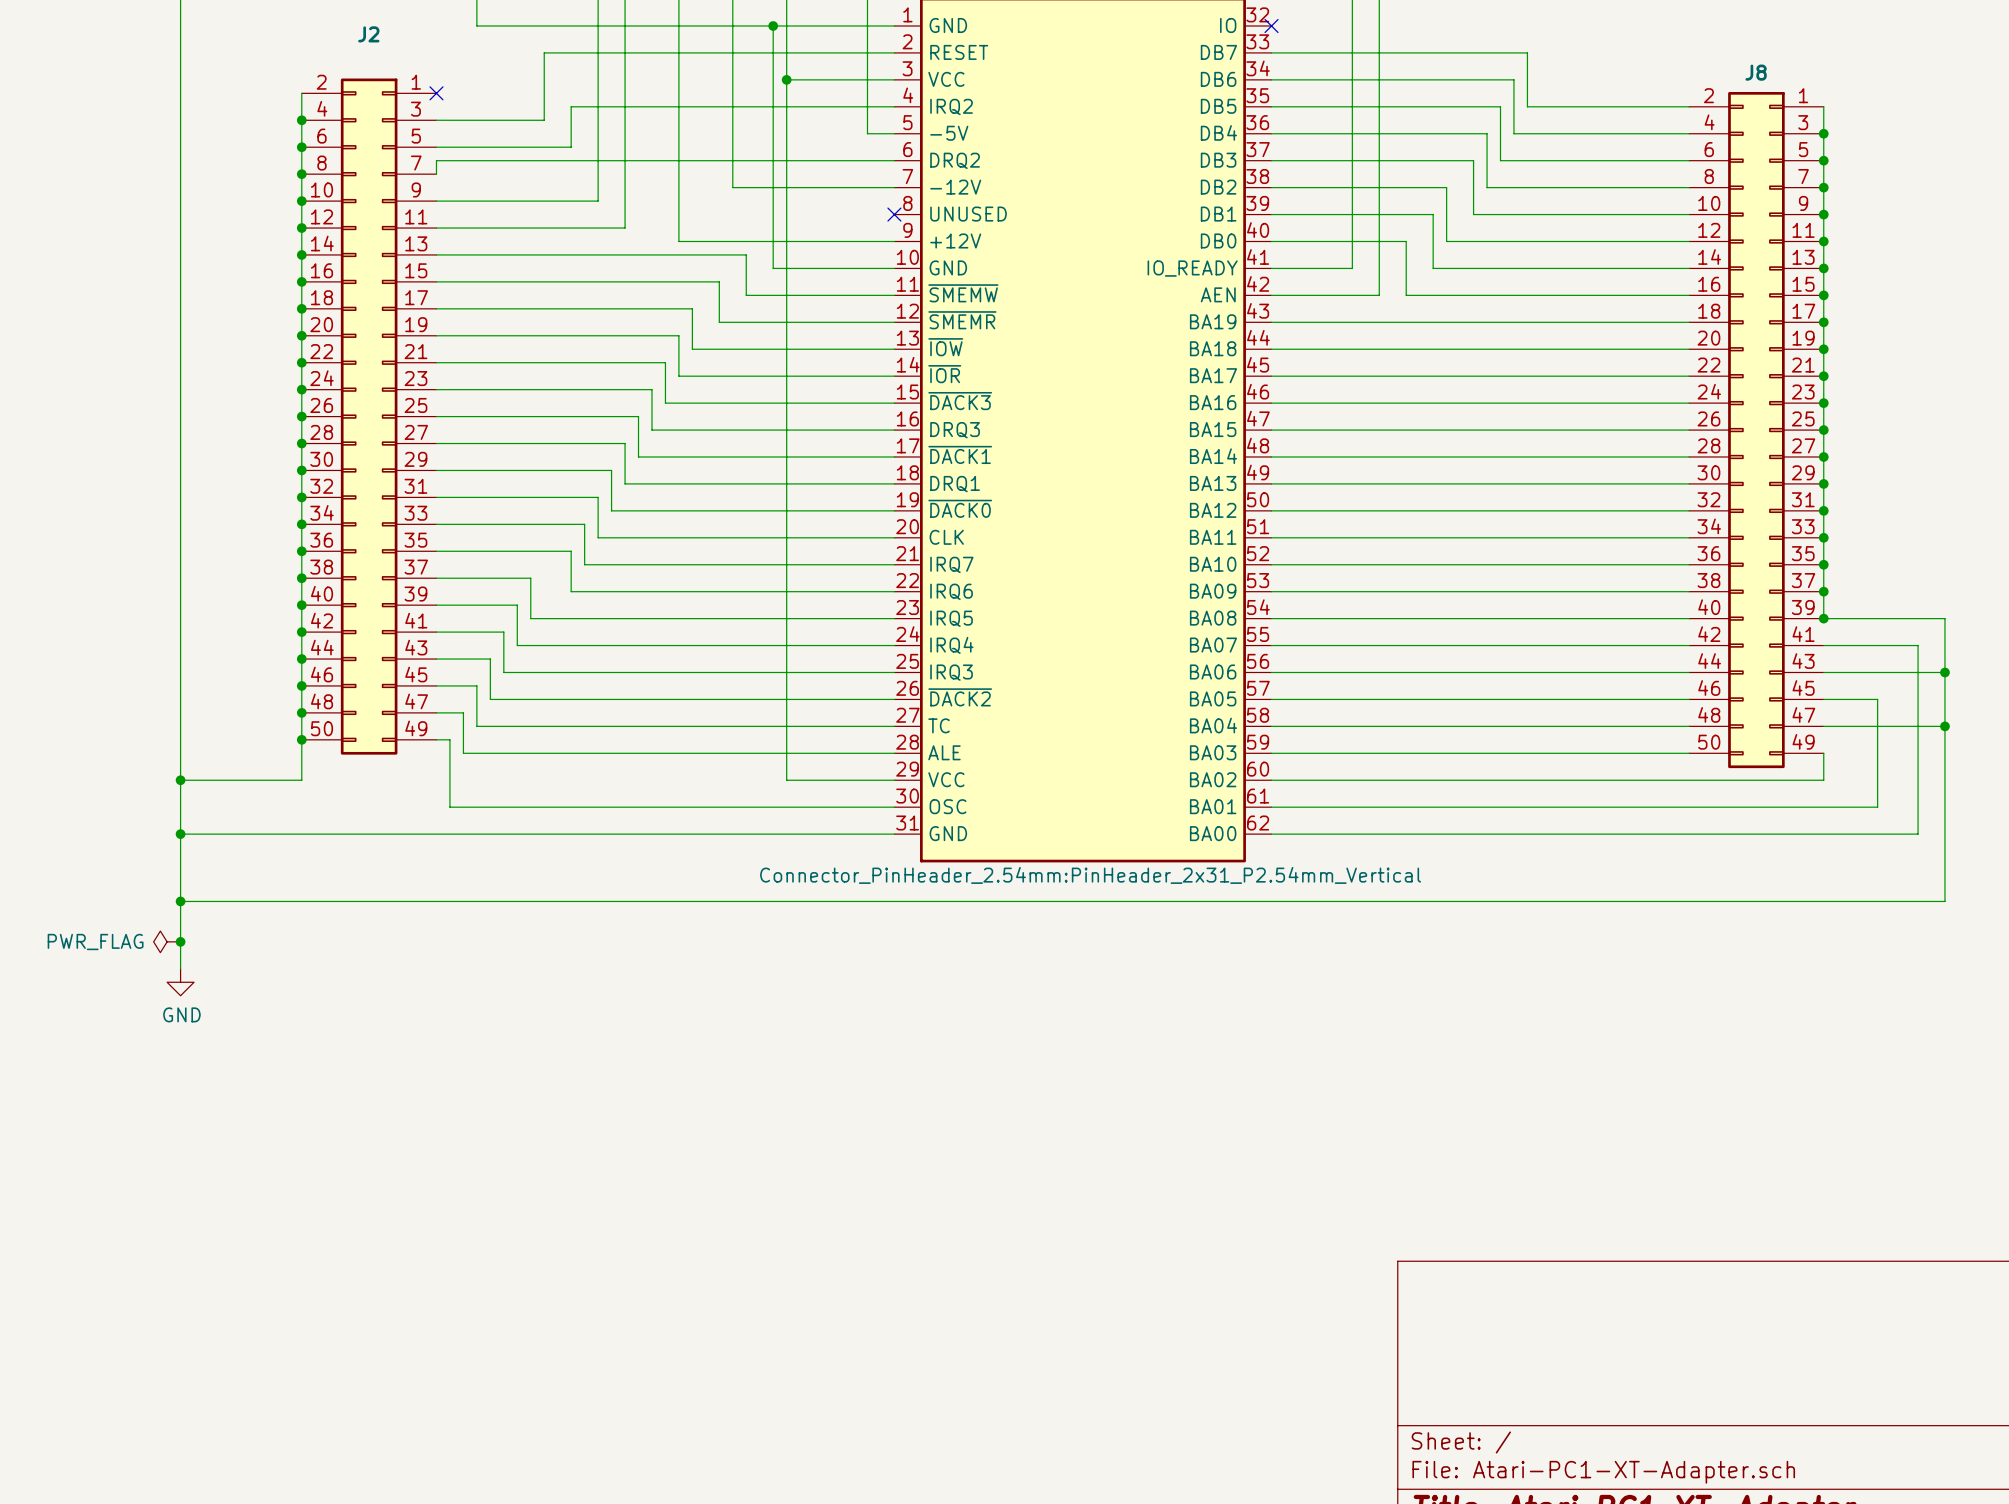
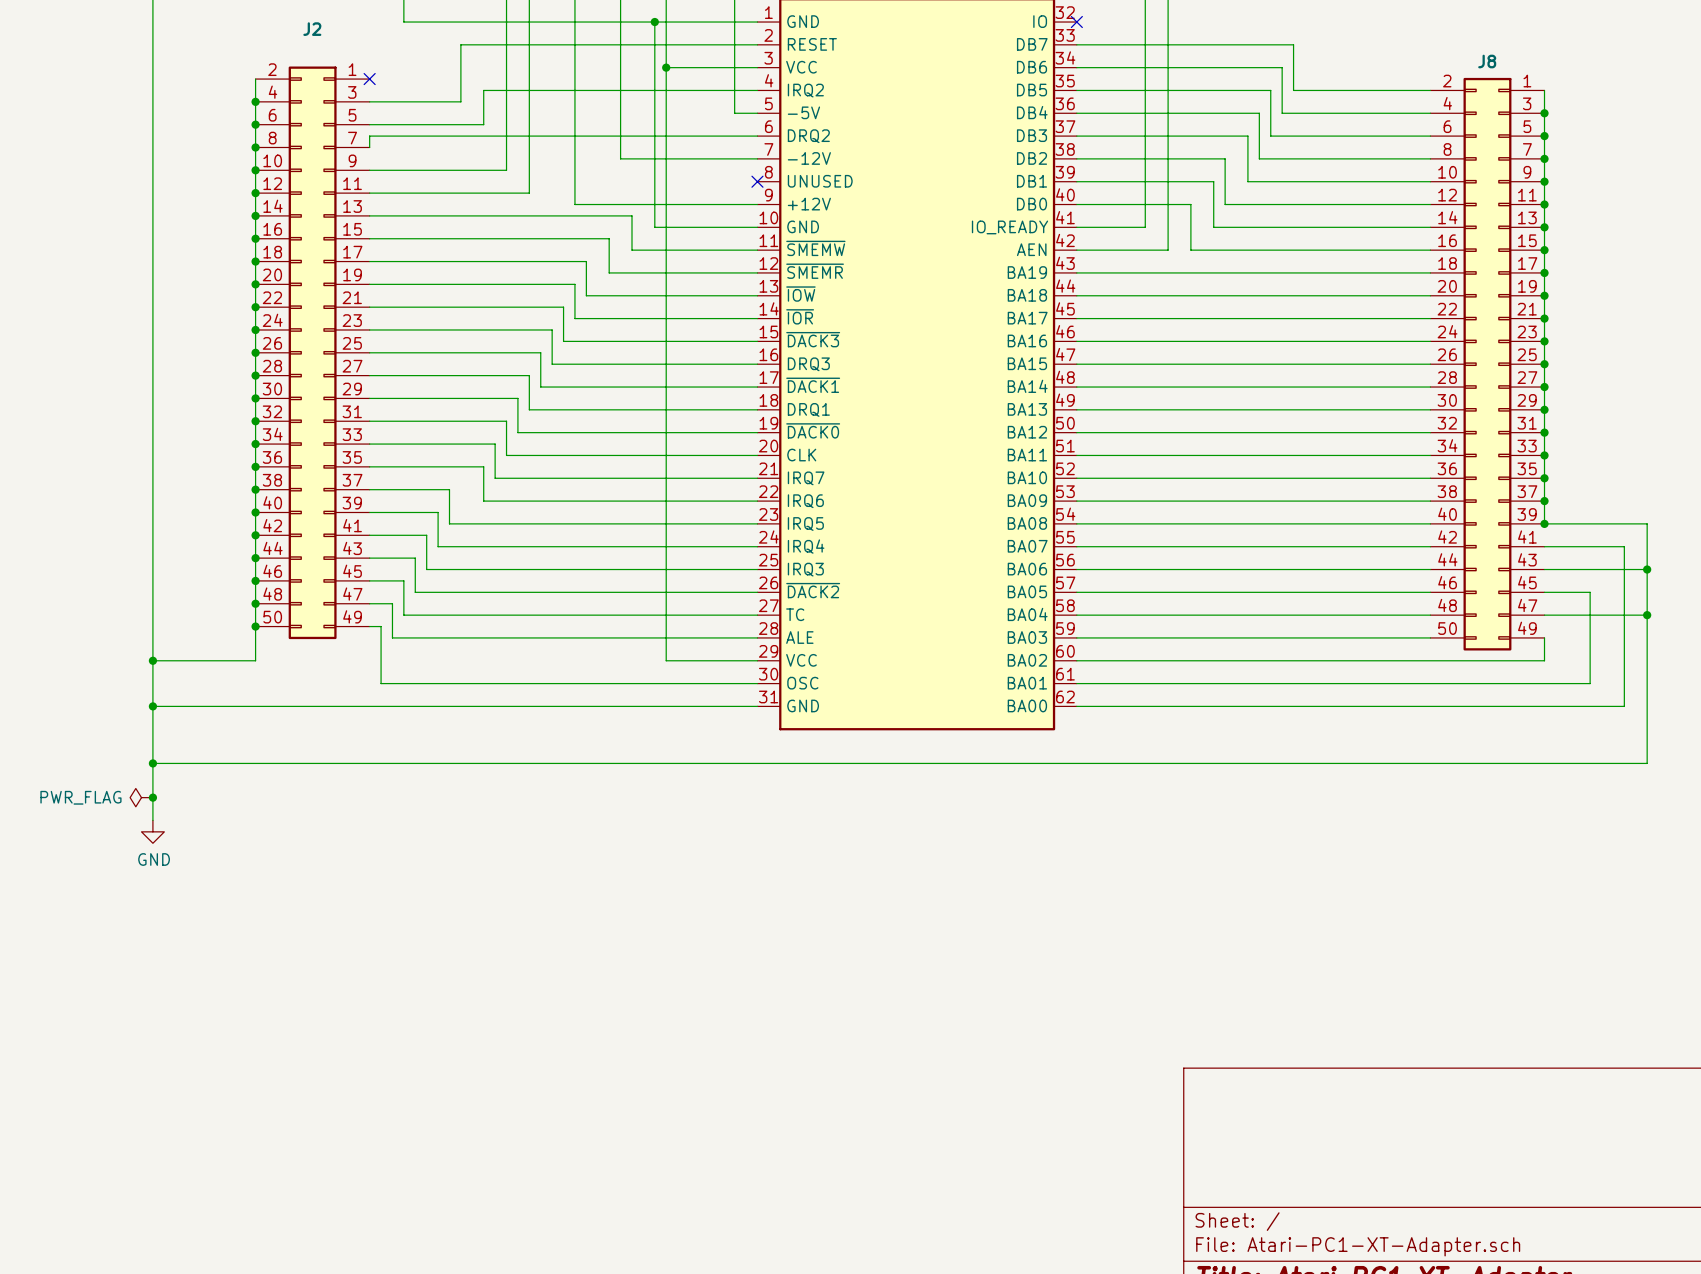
part text: Connector_PinHeader_2.54mm:PinHeader_2x31_P2.54mm_Vertical (1090, 875) -> none

